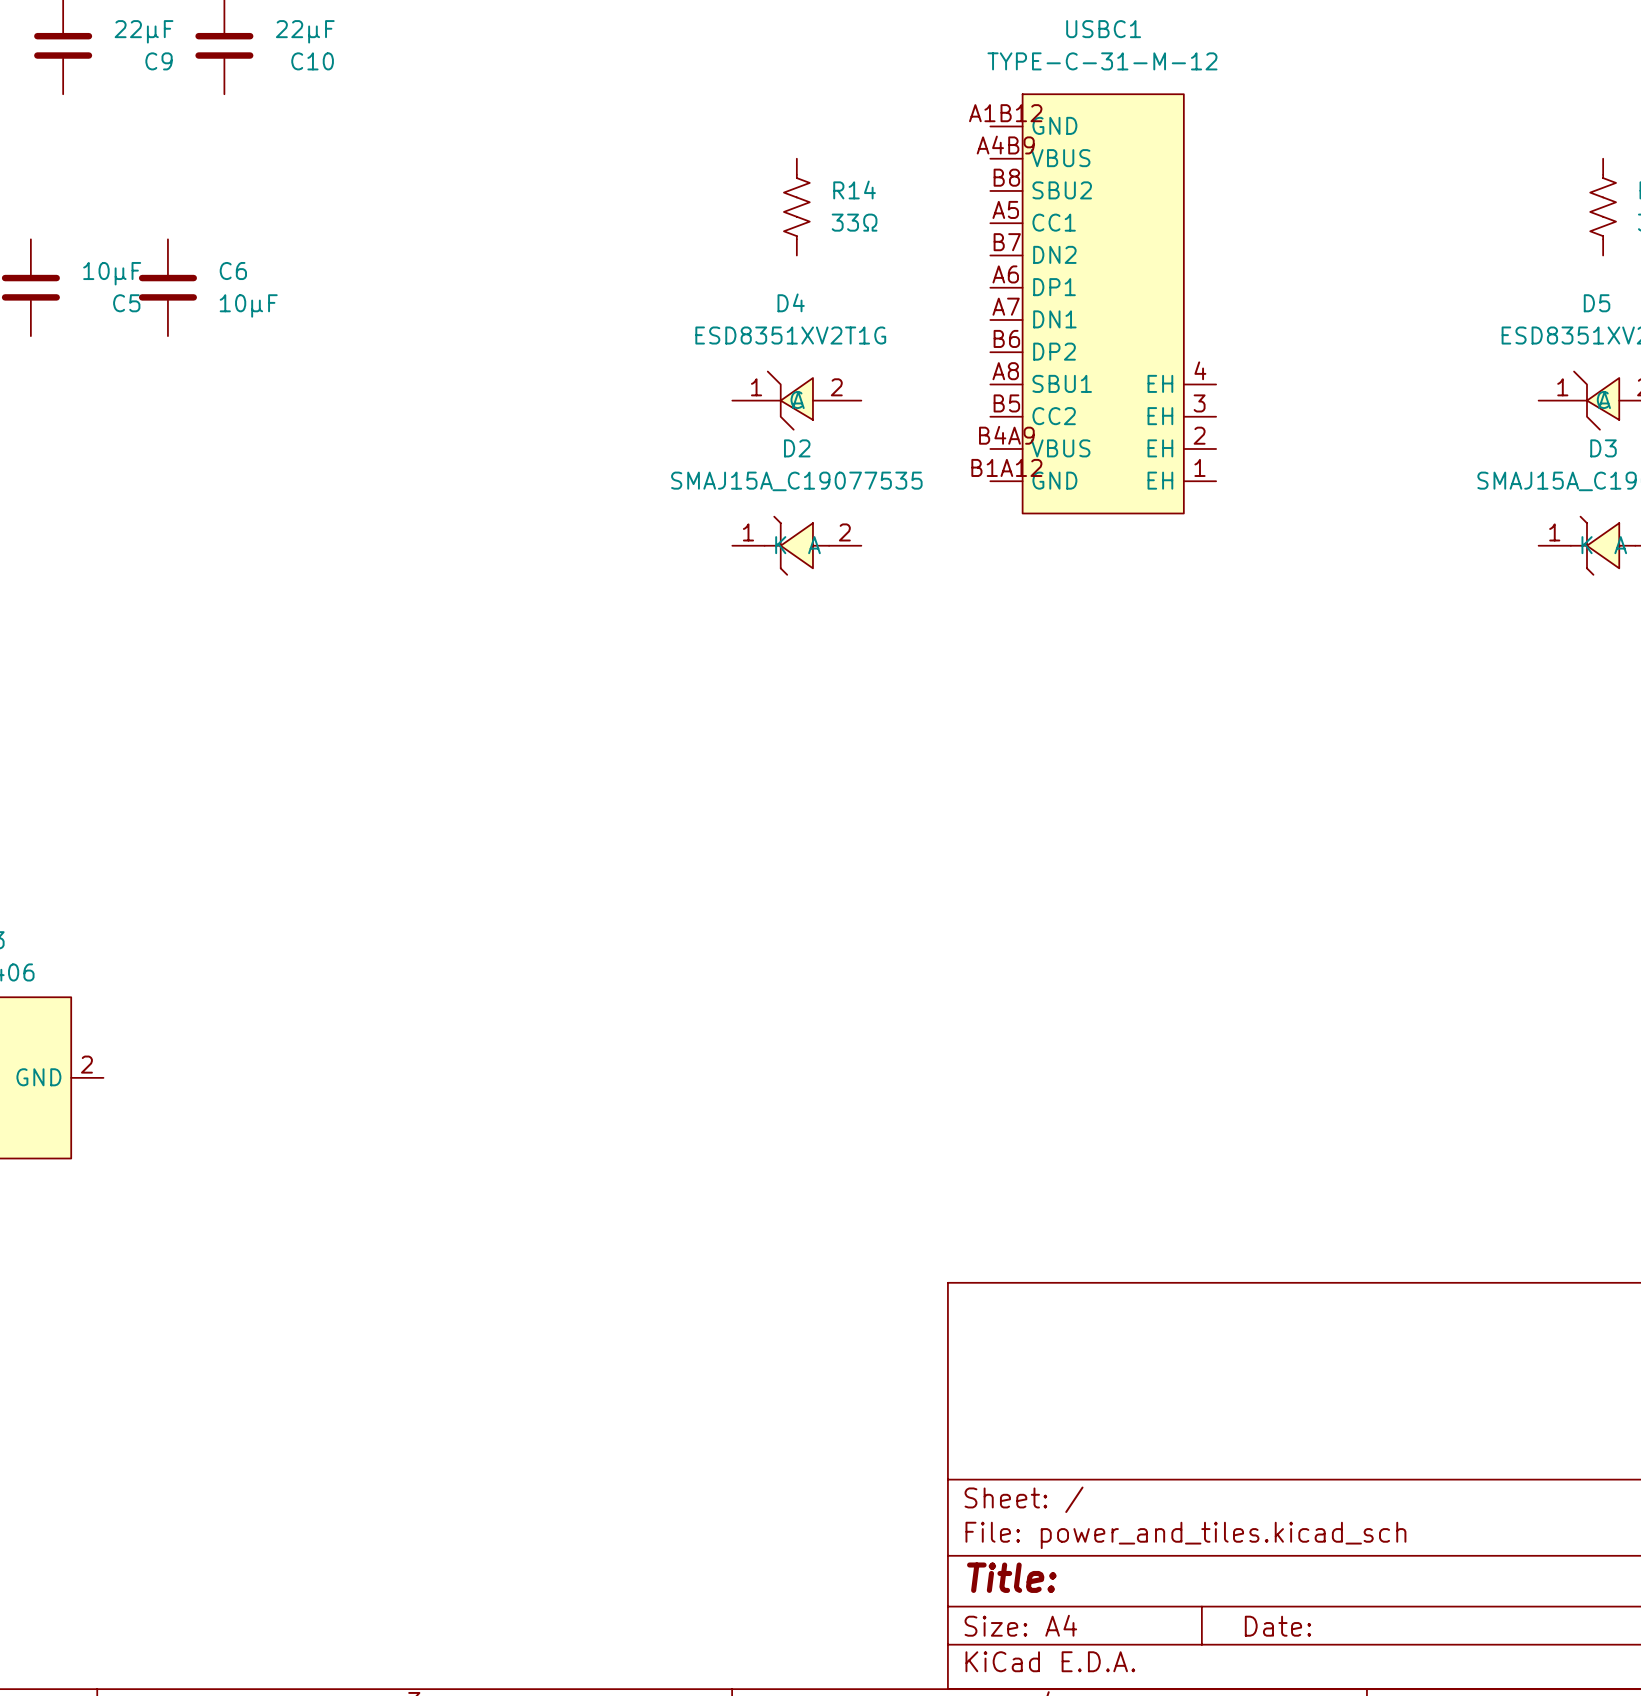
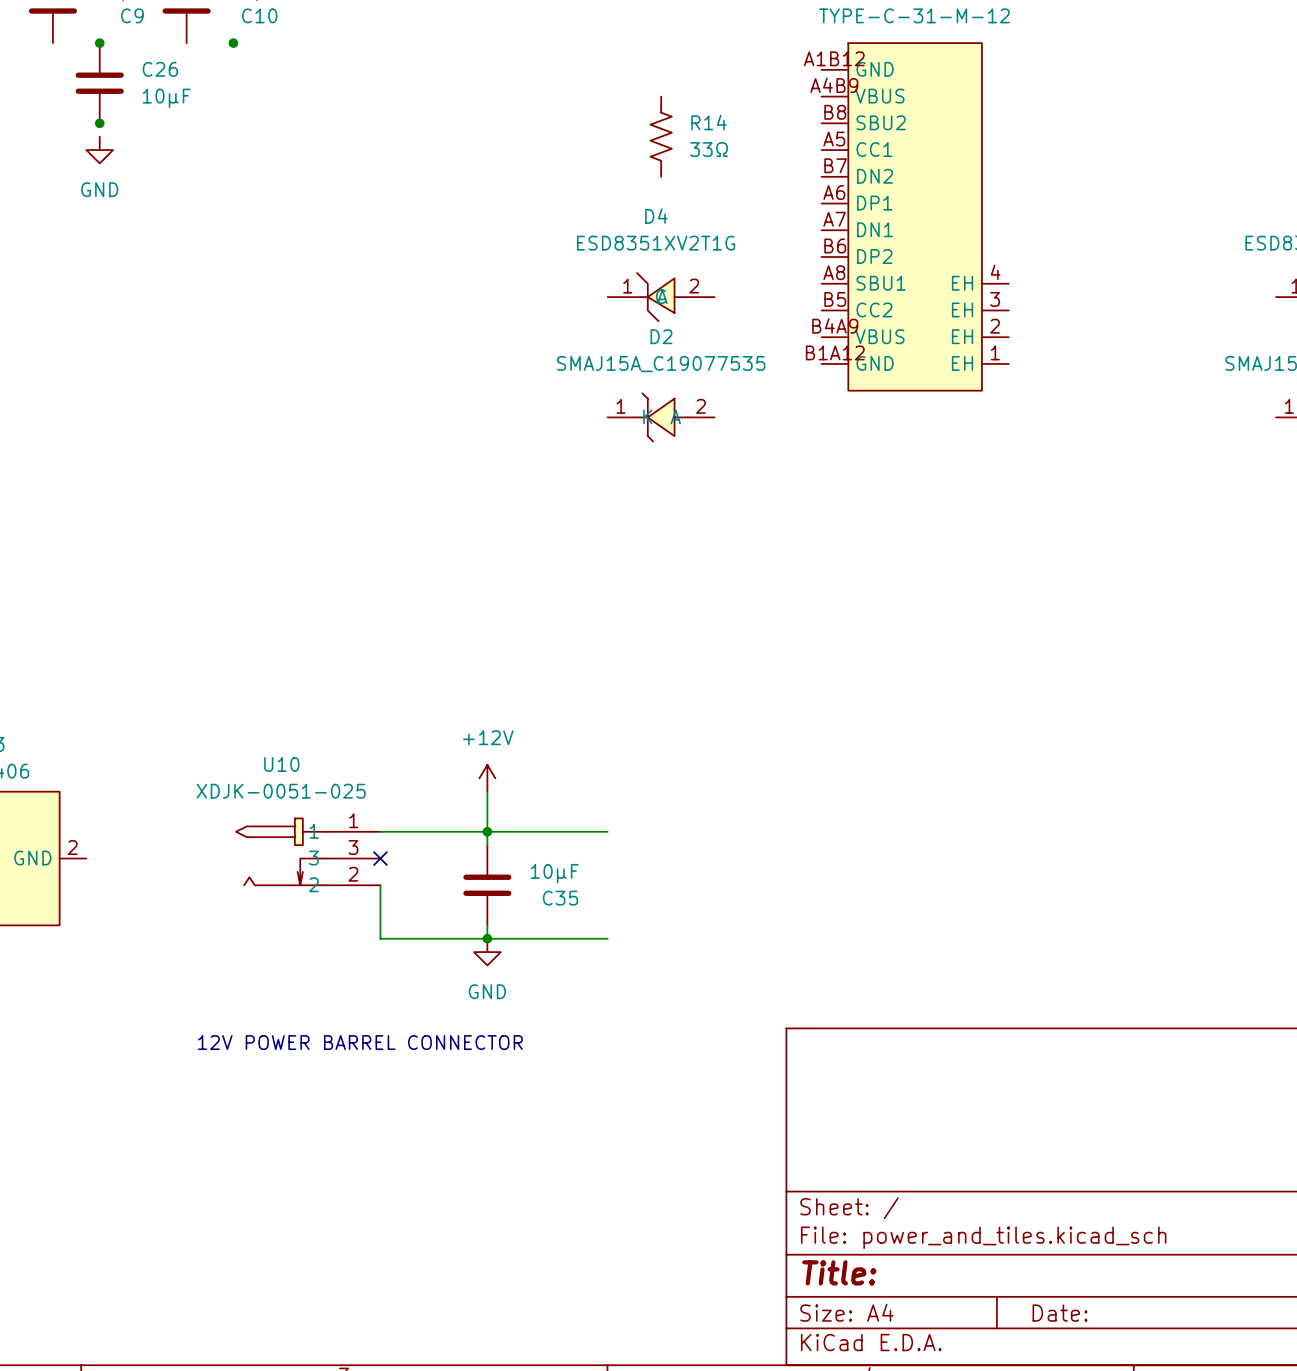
junction: none -> (99, 43)
junction: none -> (233, 43)
C26: none -> 10µF (99, 83)
junction: none -> (99, 123)
power symbol: none -> GND (99, 150)
C5: 10µF (30, 287) -> none
C6: 10µF (167, 287) -> none
power symbol: none -> +12V (487, 778)
wire: none -> (487, 791) (487, 845)
wire: none -> (380, 831) (607, 831)
junction: none -> (487, 831)
U10: none -> XDJK-0051-025 (308, 851)
no-connect mark: none -> (380, 858)
wire: none -> (380, 885) (380, 938) (607, 938)
C35: none -> 10µF (487, 885)
wire: none -> (487, 925) (487, 938)
junction: none -> (487, 938)
power symbol: none -> GND (487, 952)
text: none -> 12V POWER BARREL CONNECTOR (360, 1042)

